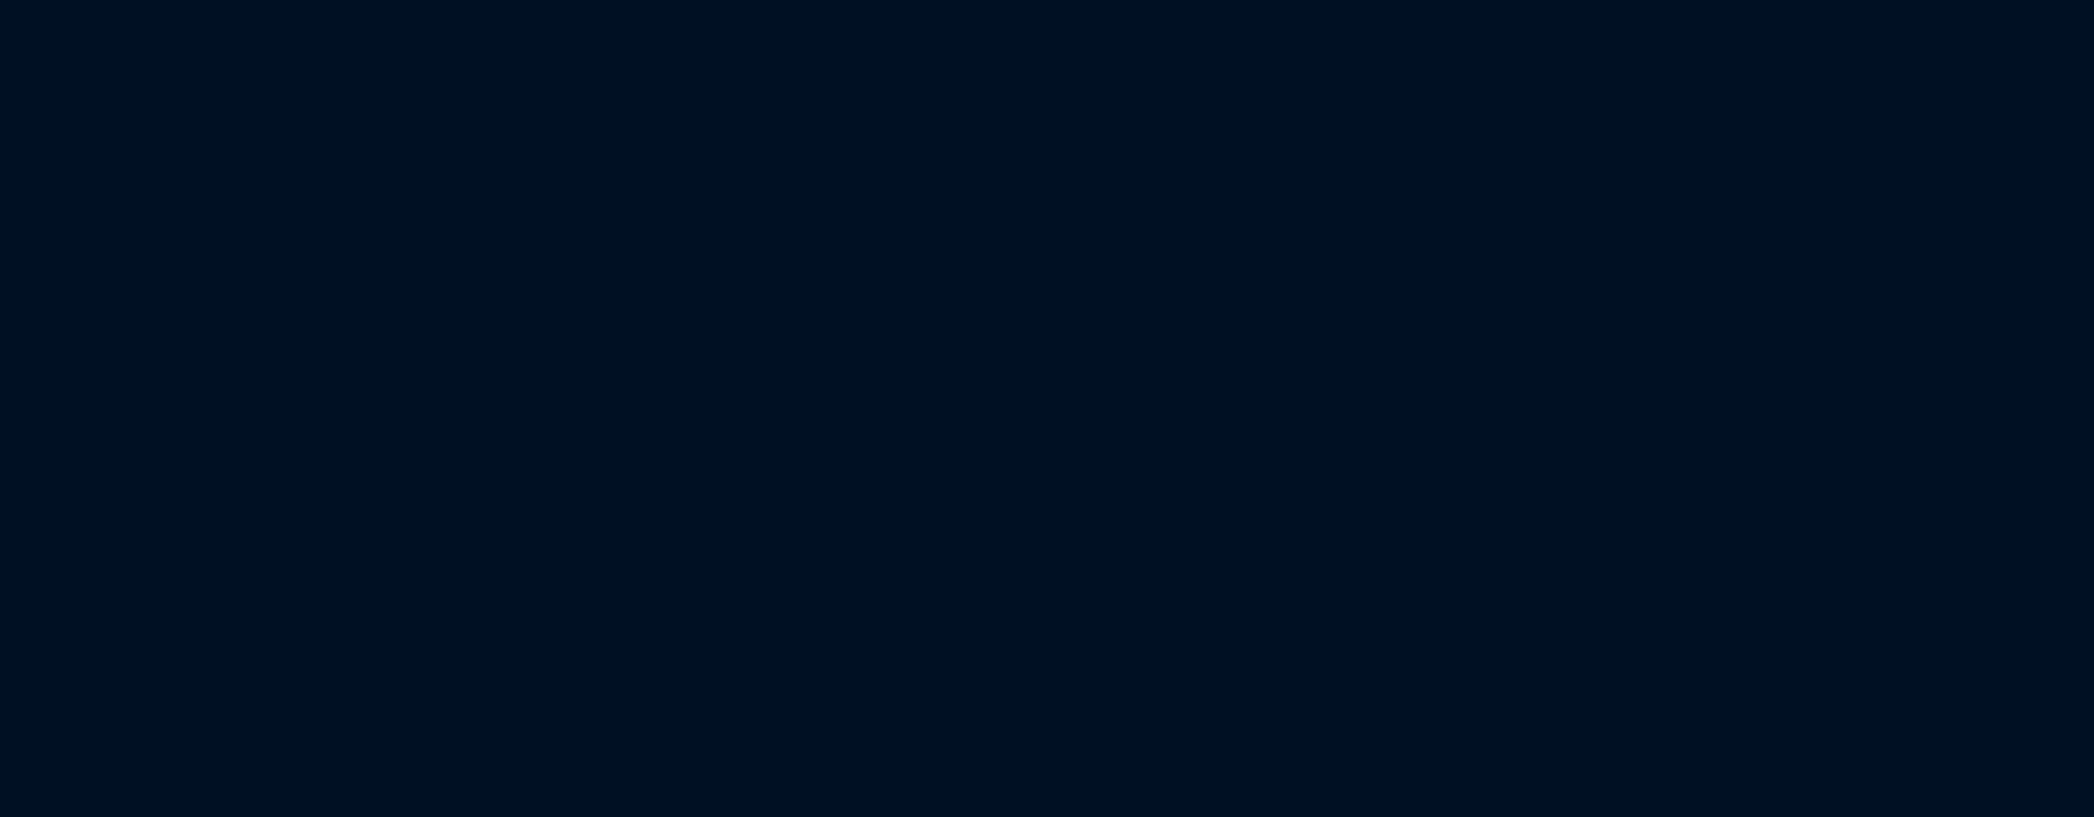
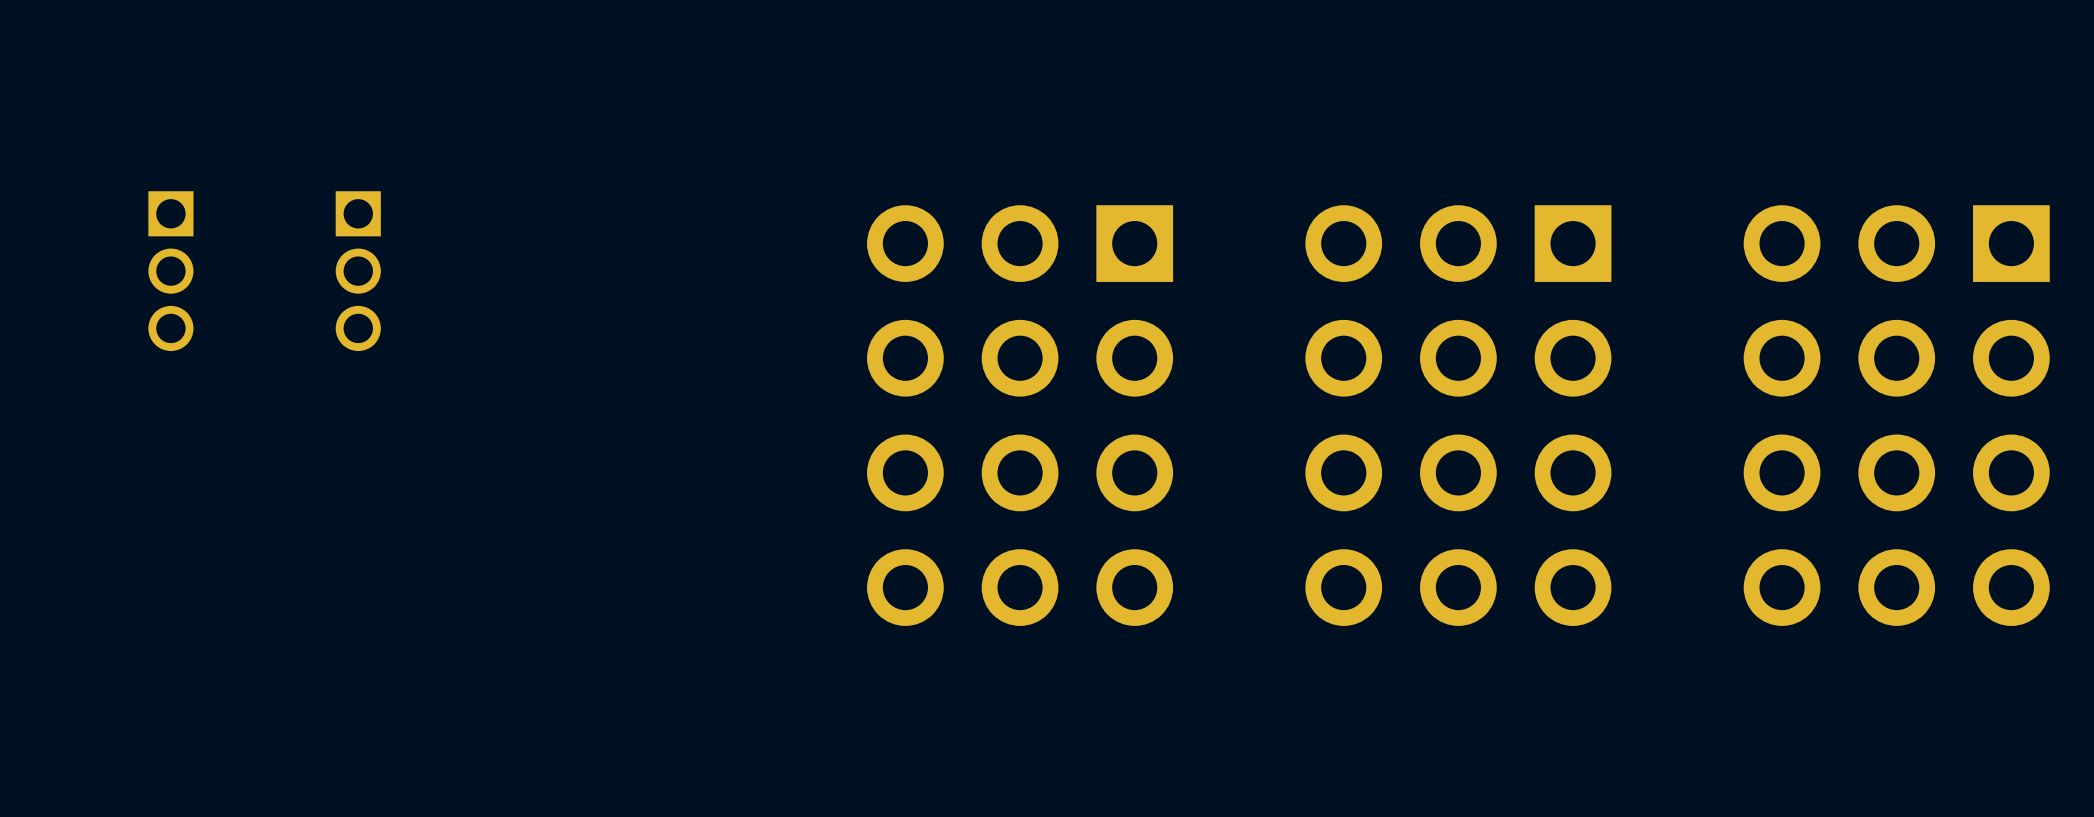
part: none -> (170, 271)
part: none -> (358, 271)
part: none -> (1020, 415)
part: none -> (1458, 415)
part: none -> (1896, 415)

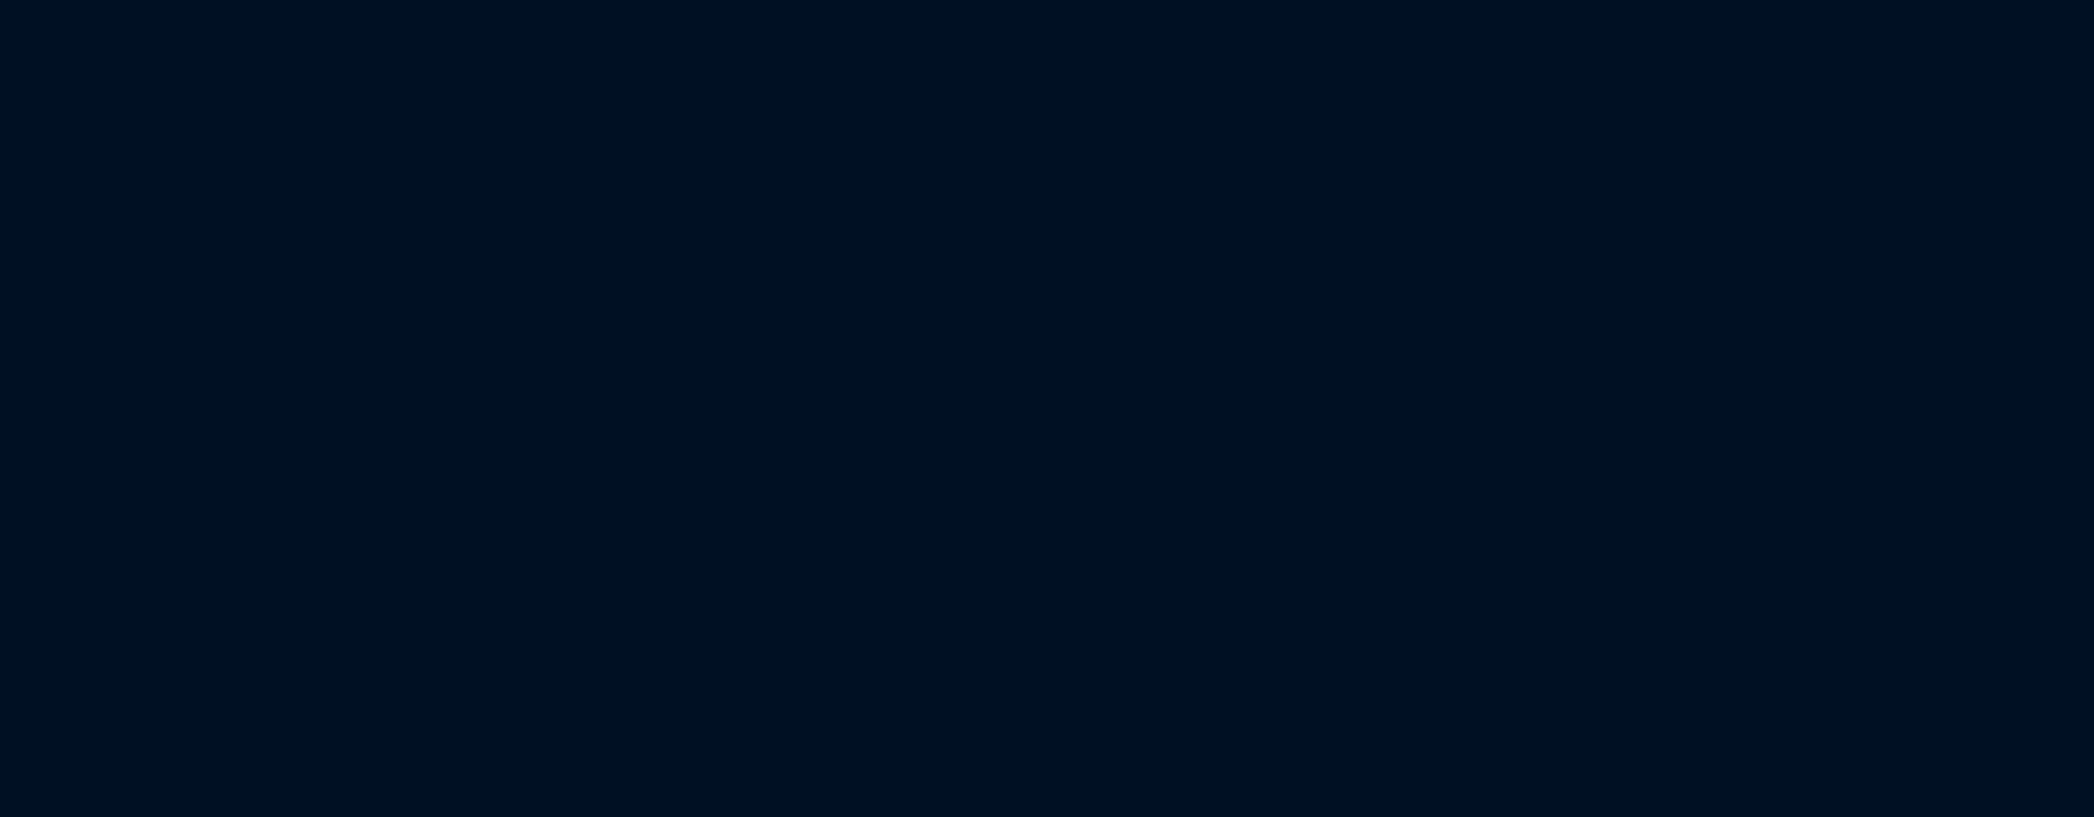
part: (170, 271) -> none
part: (358, 271) -> none
part: (1020, 415) -> none
part: (1458, 415) -> none
part: (1896, 415) -> none

